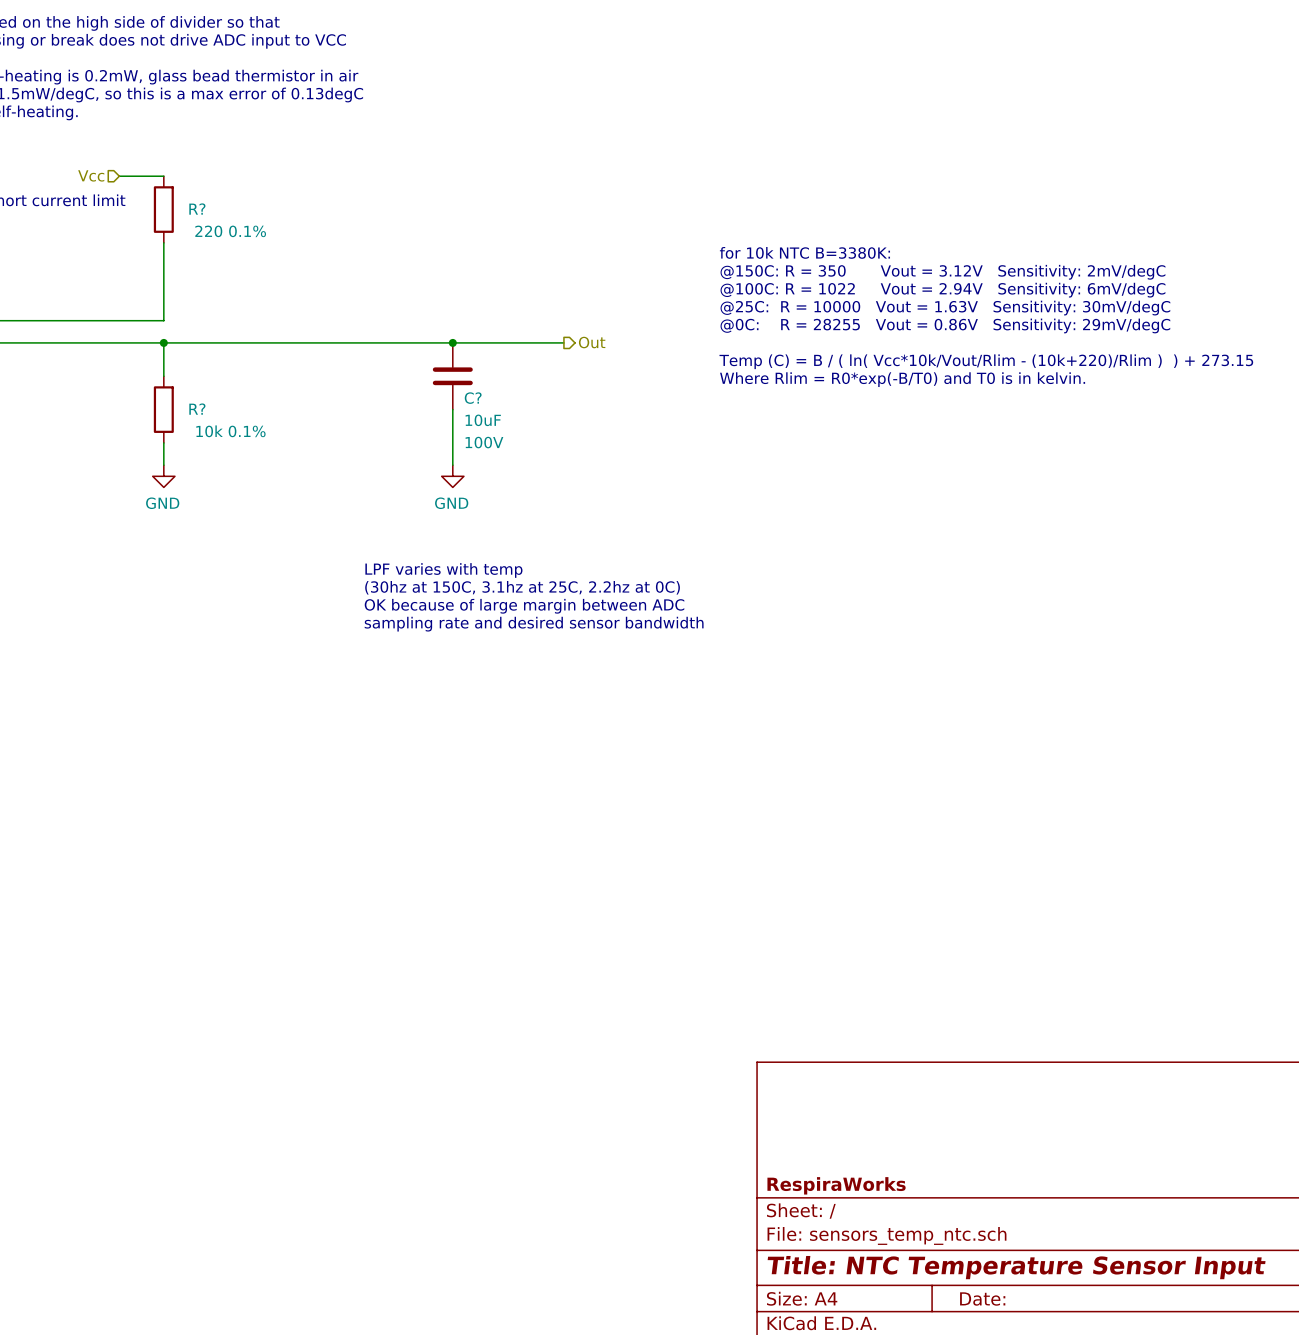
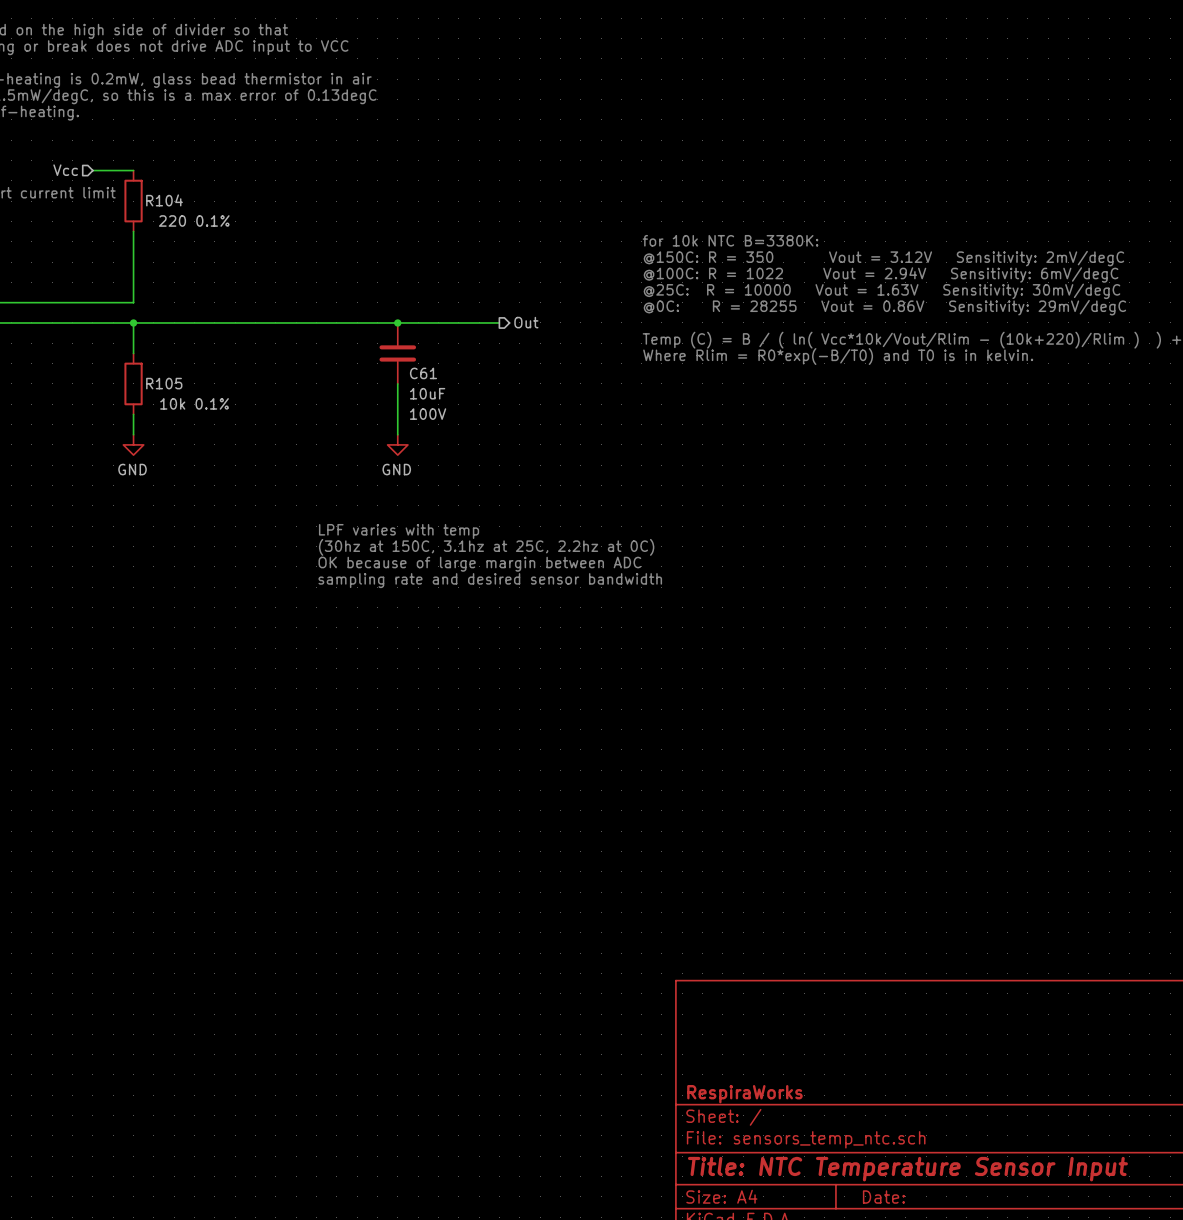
R? name: R? (197, 209) -> R104 (164, 200)
C? name: C? (473, 398) -> C61 (423, 373)
R? name: R? (197, 409) -> R105 (164, 383)

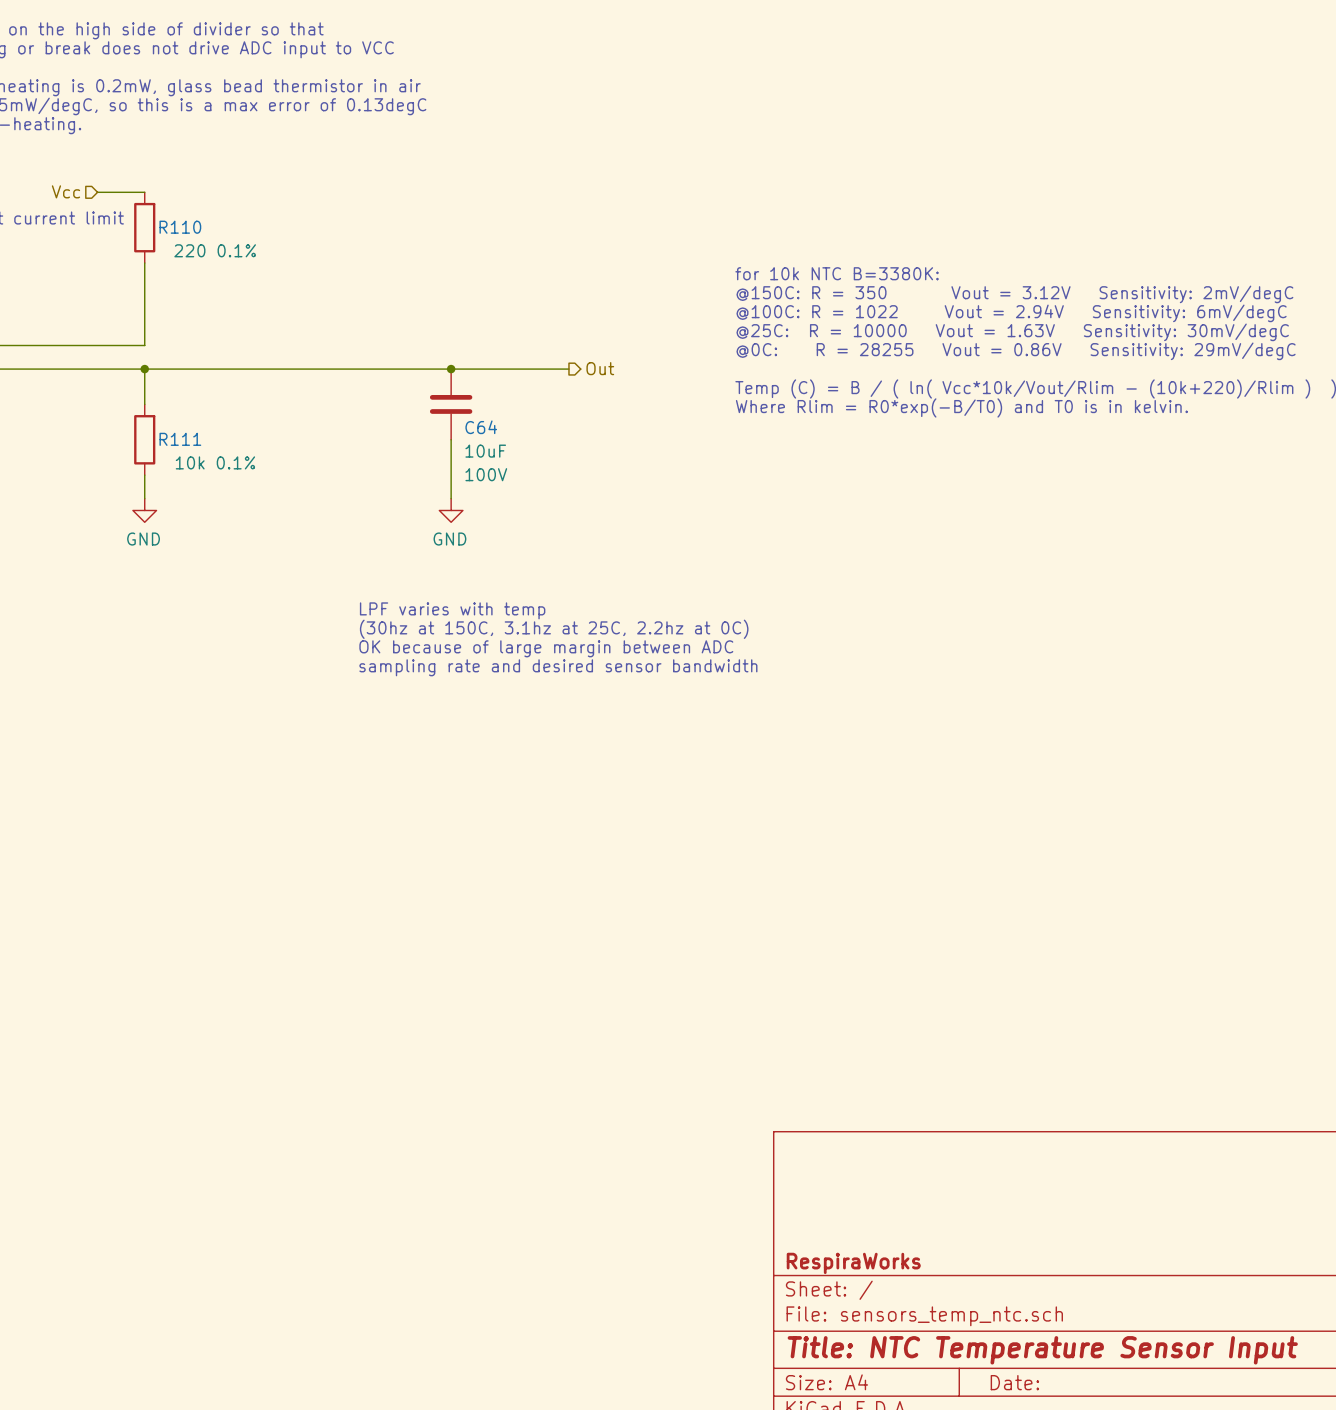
R104 name: R104 (164, 200) -> R110 (180, 227)
C61 name: C61 (423, 373) -> C64 (481, 427)
R105 name: R105 (164, 383) -> R111 (180, 439)

